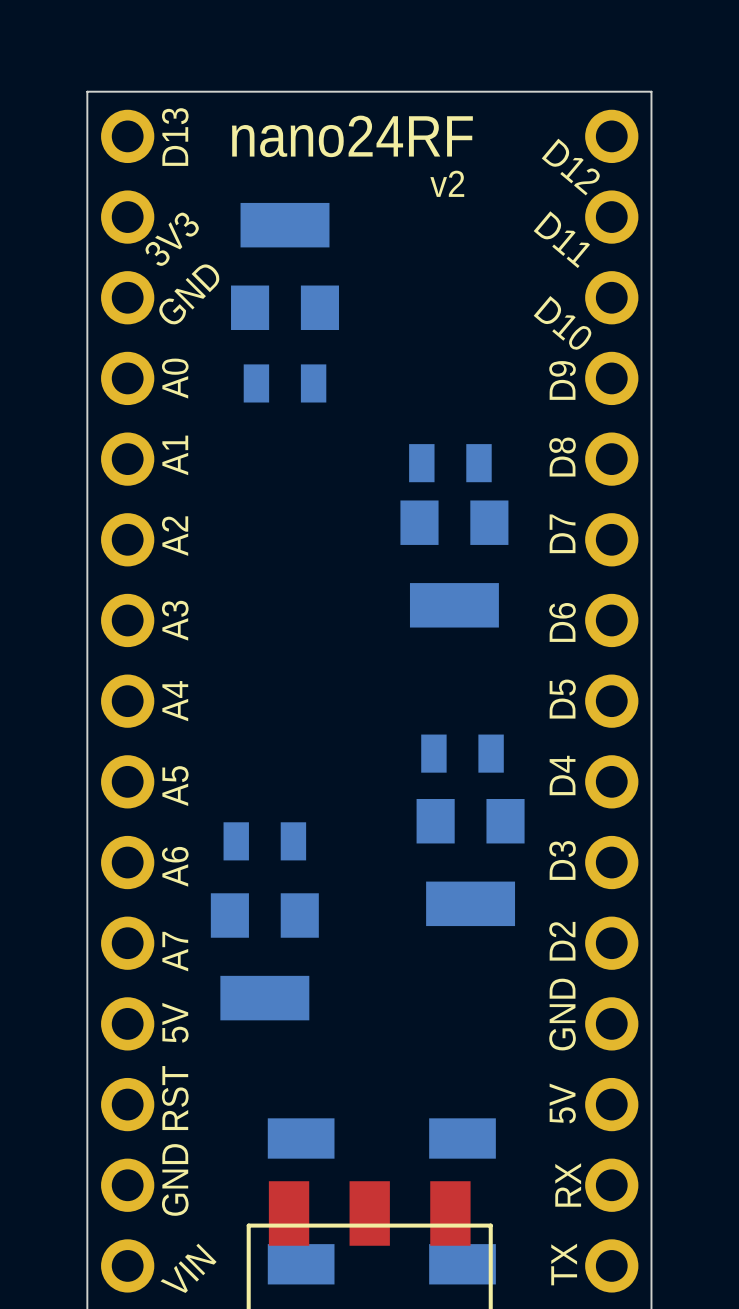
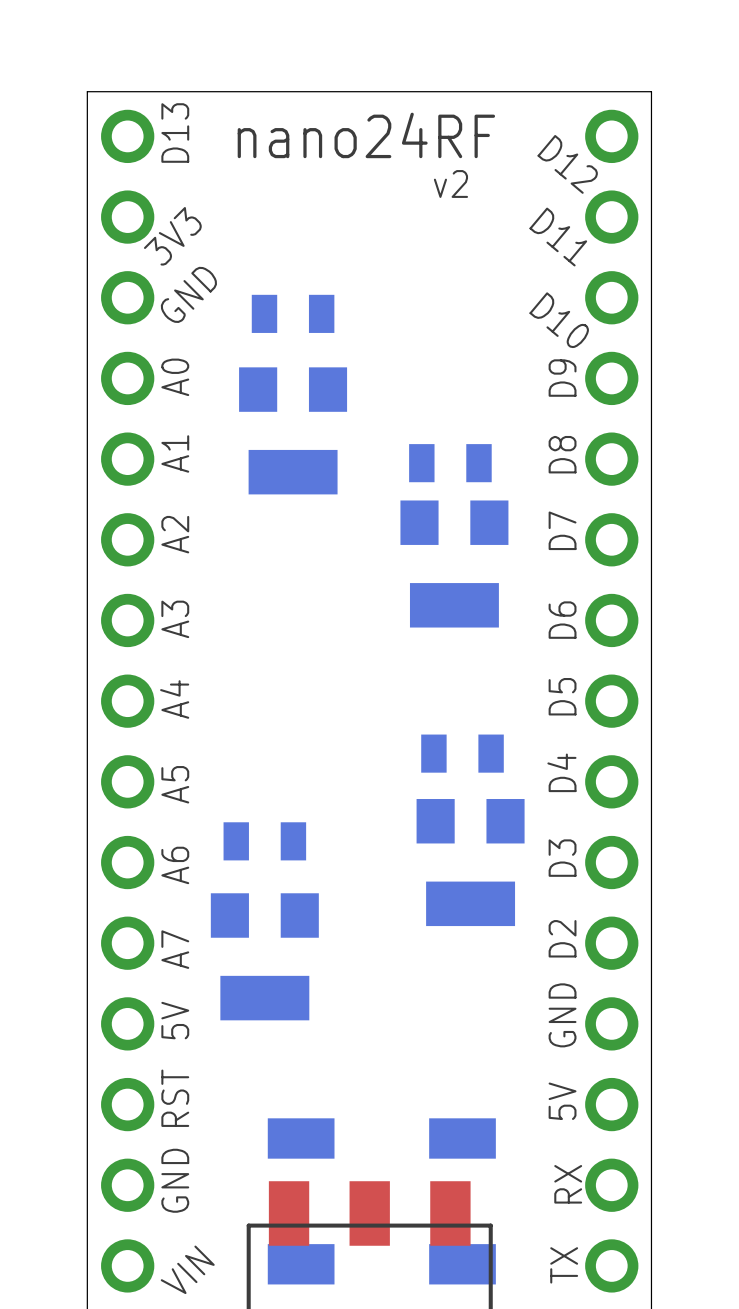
part rotation: 0° (285, 266) -> 180° (293, 430)
part position: (285, 266) -> (293, 430)
part position: (285, 383) -> (293, 313)

